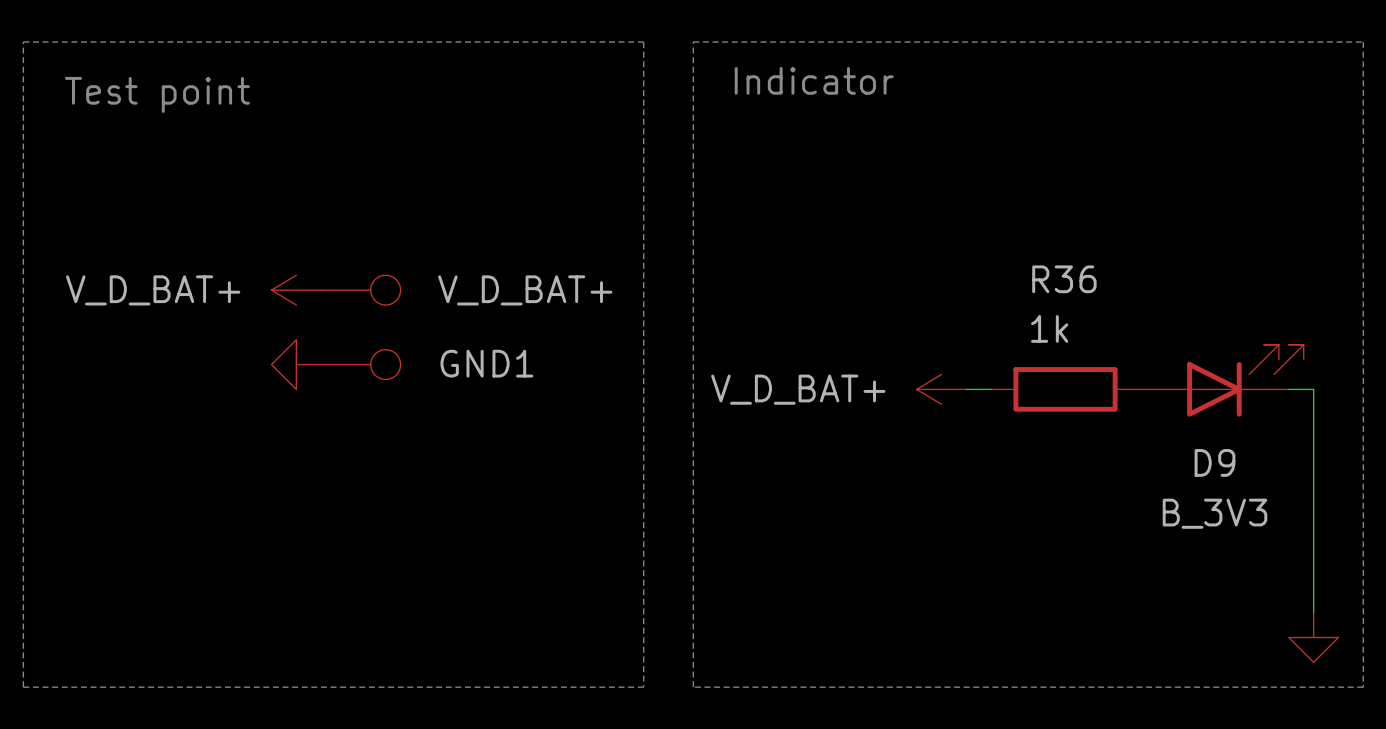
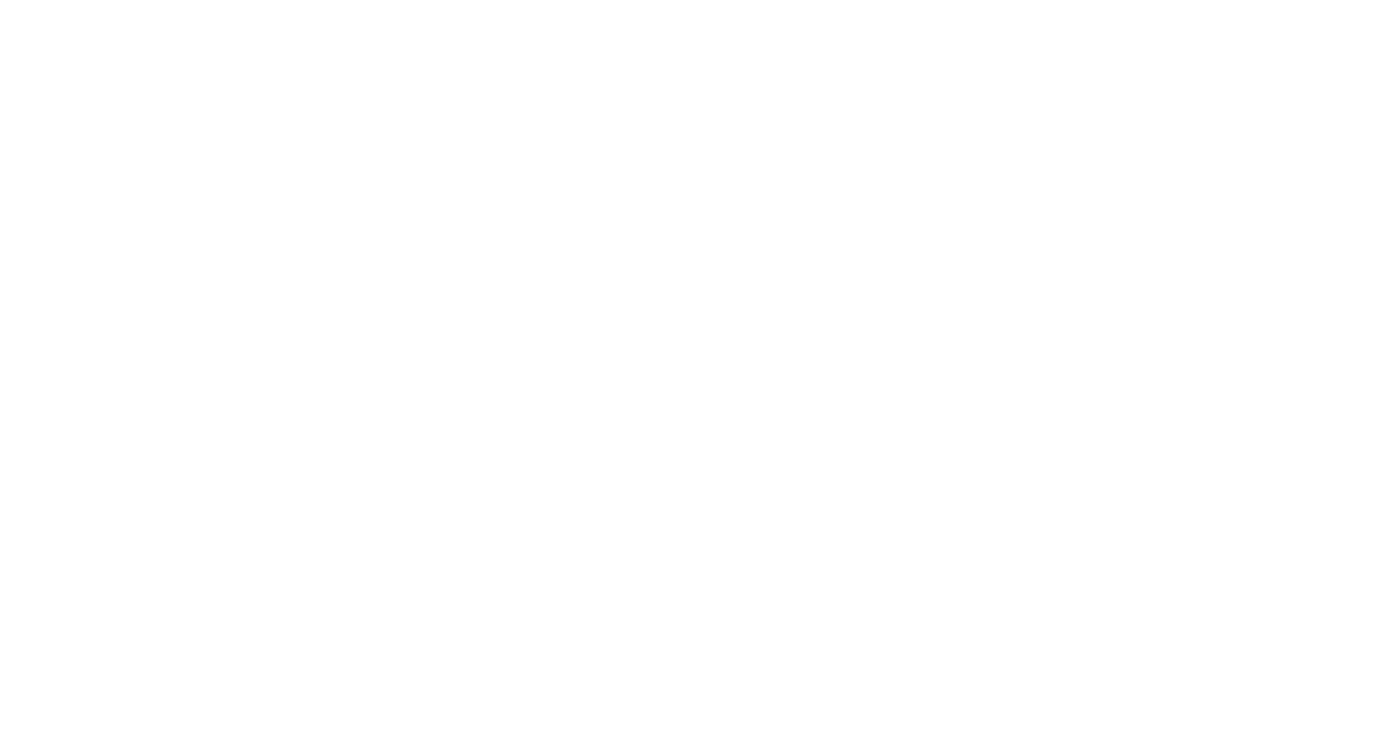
line: (23, 42) (643, 42) (643, 687) (23, 687) (23, 42) -> none
line: (693, 42) (1363, 42) (1363, 687) (693, 687) (693, 42) -> none
text: Indicator (814, 80) -> none
text: Test point (157, 94) -> none
power symbol: V_D_BAT+ (296, 290) -> none
V_D_BAT+: (360, 290) -> none
power symbol: (296, 364) -> none
GND1: (360, 364) -> none
D9: B_3V3 (1221, 380) -> none
power symbol: V_D_BAT+ (941, 389) -> none
wire: (966, 389) (991, 389) -> none
R36: 1k (1065, 389) -> none
wire: (1288, 389) (1313, 389) (1313, 612) -> none
power symbol: (1313, 637) -> none

